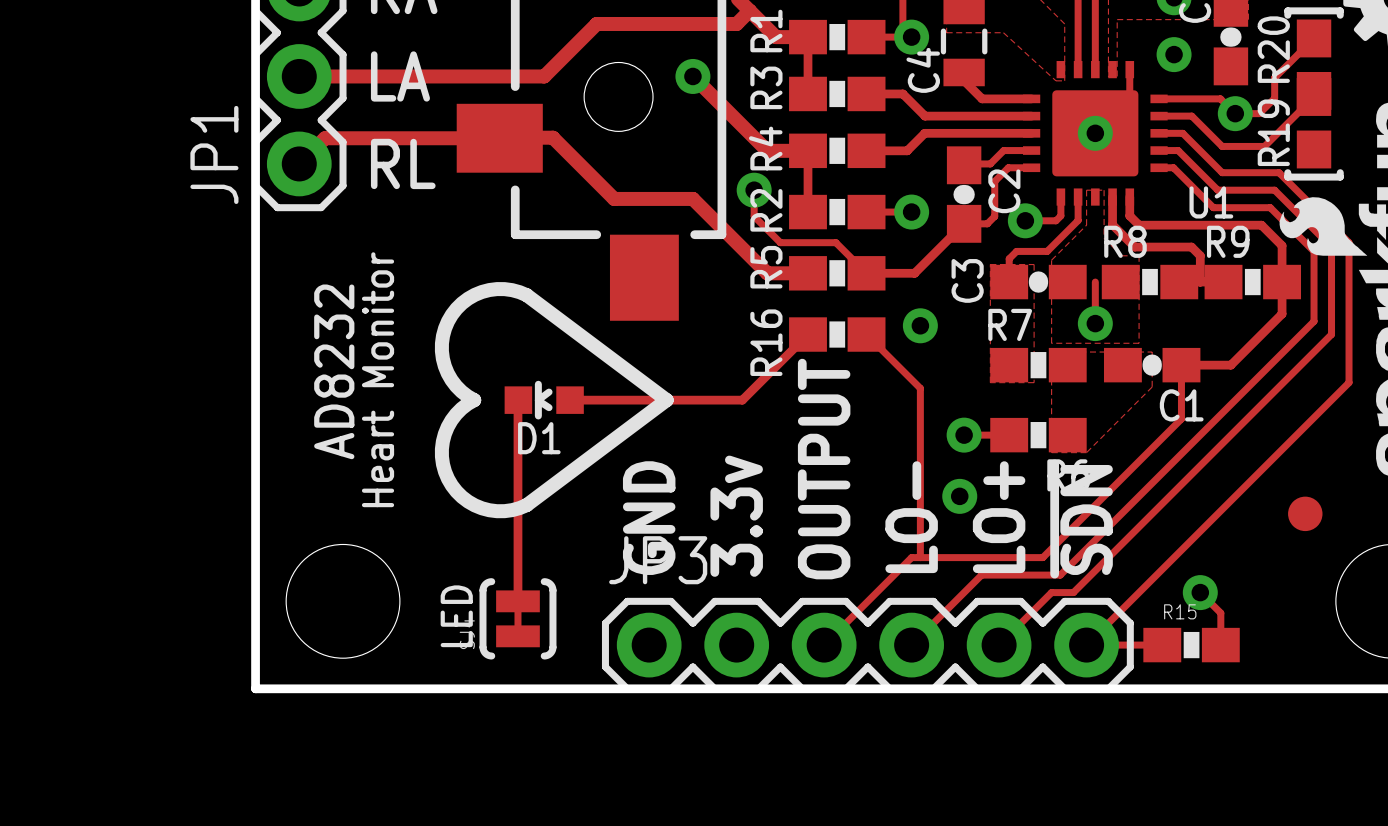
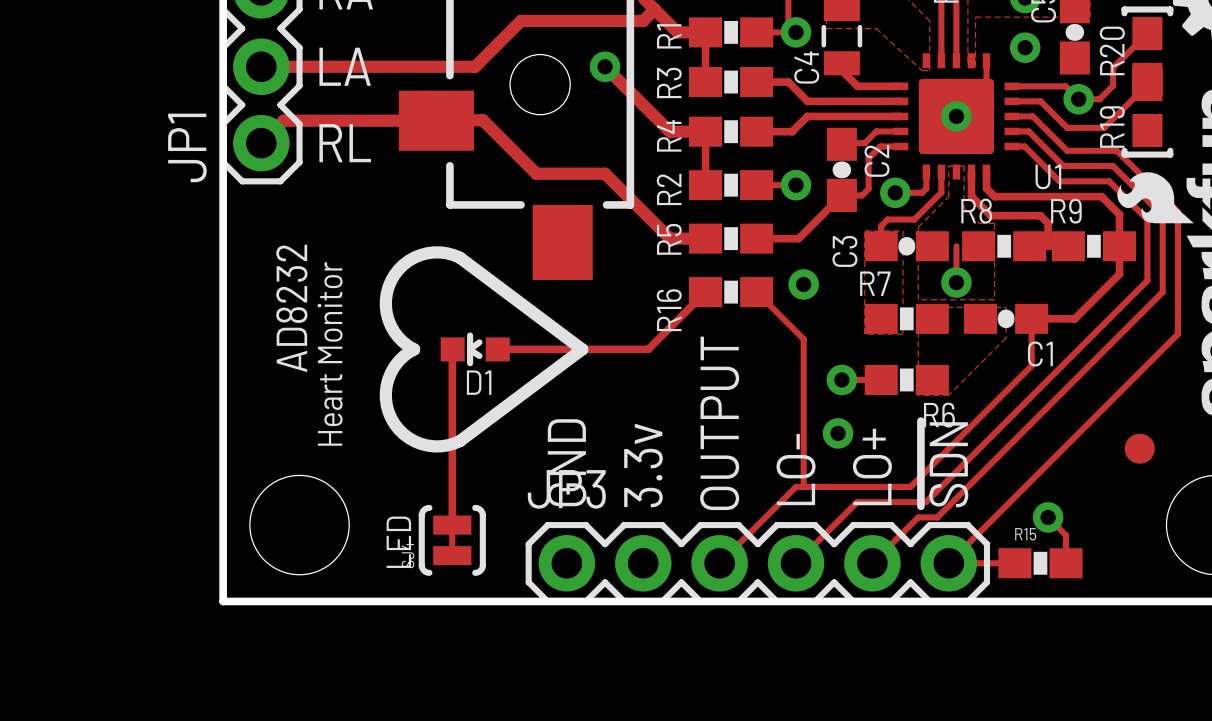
track: (754, 190) (754, 216) (780, 242) (835, 242) (866, 273) -> none
via: (754, 190) -> none

